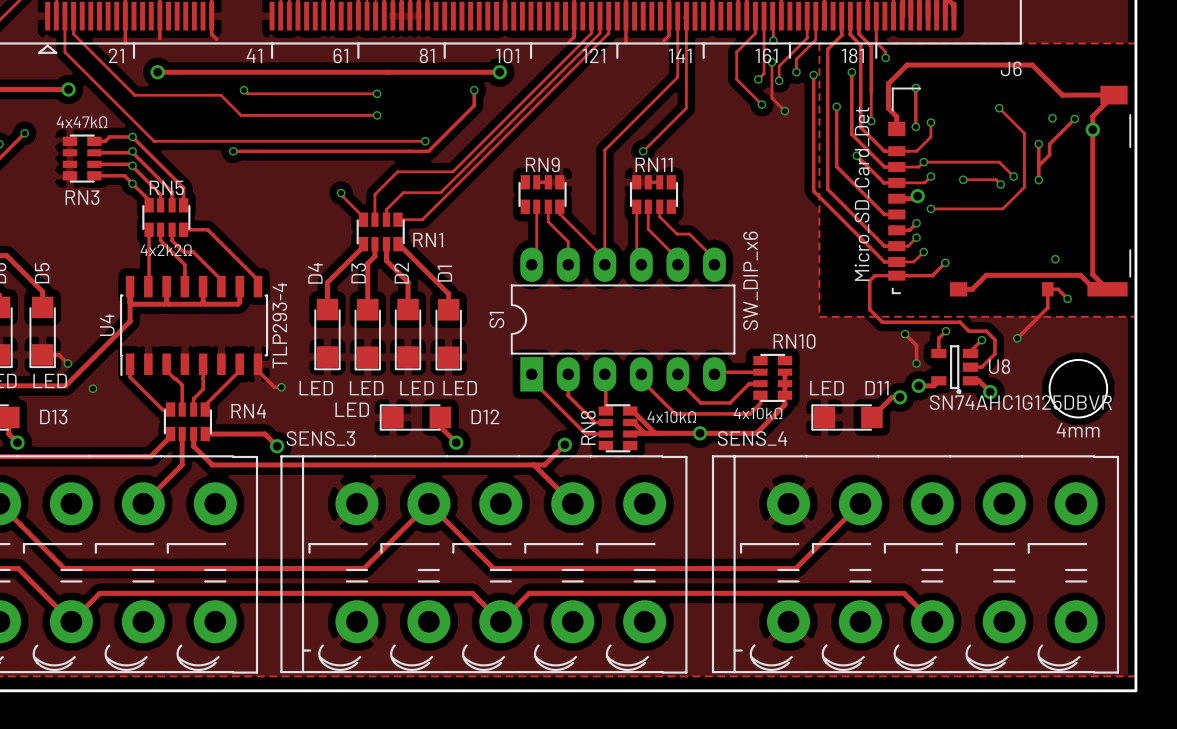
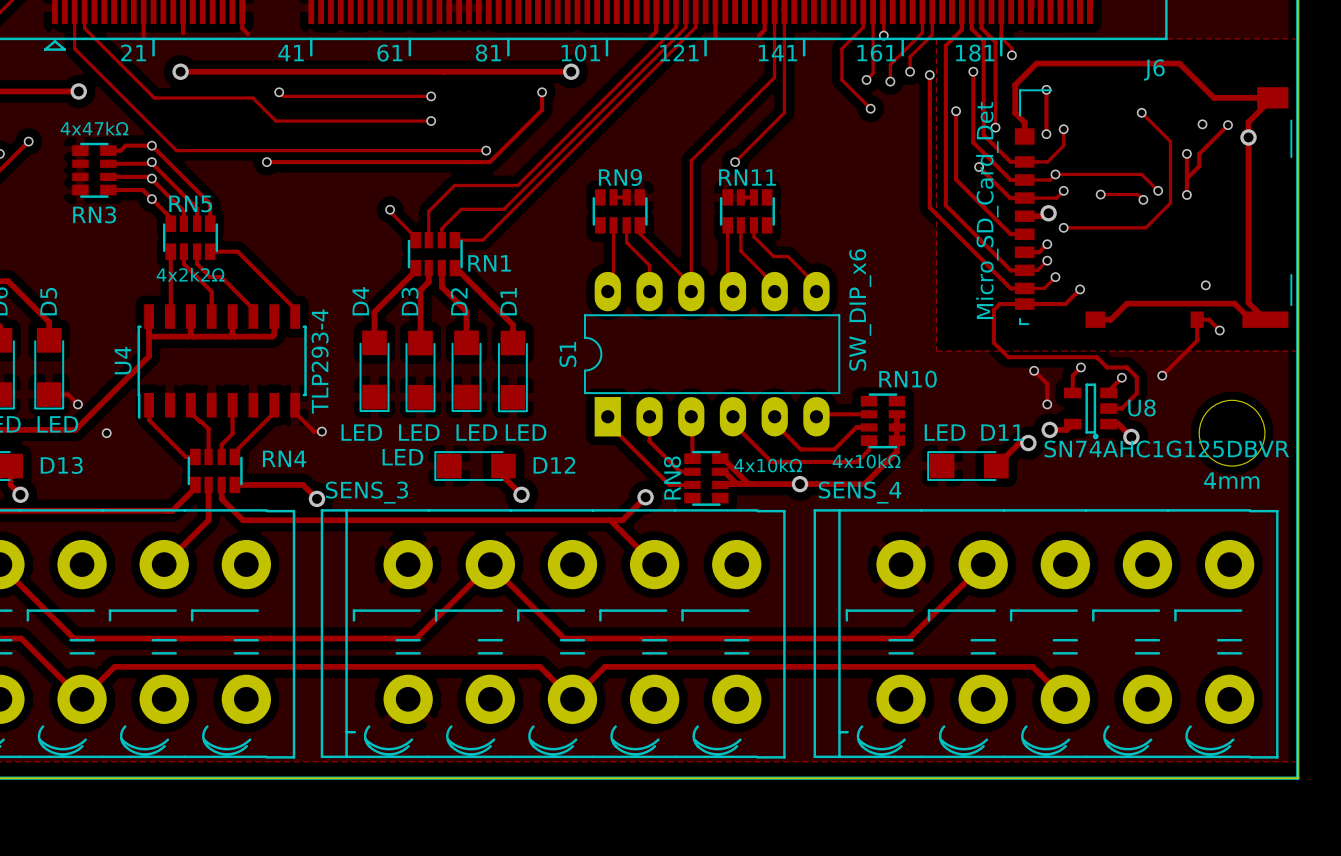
track: (771, 62) (771, 98) (784, 111) -> none
via: (771, 62) -> none
via: (784, 111) -> none

